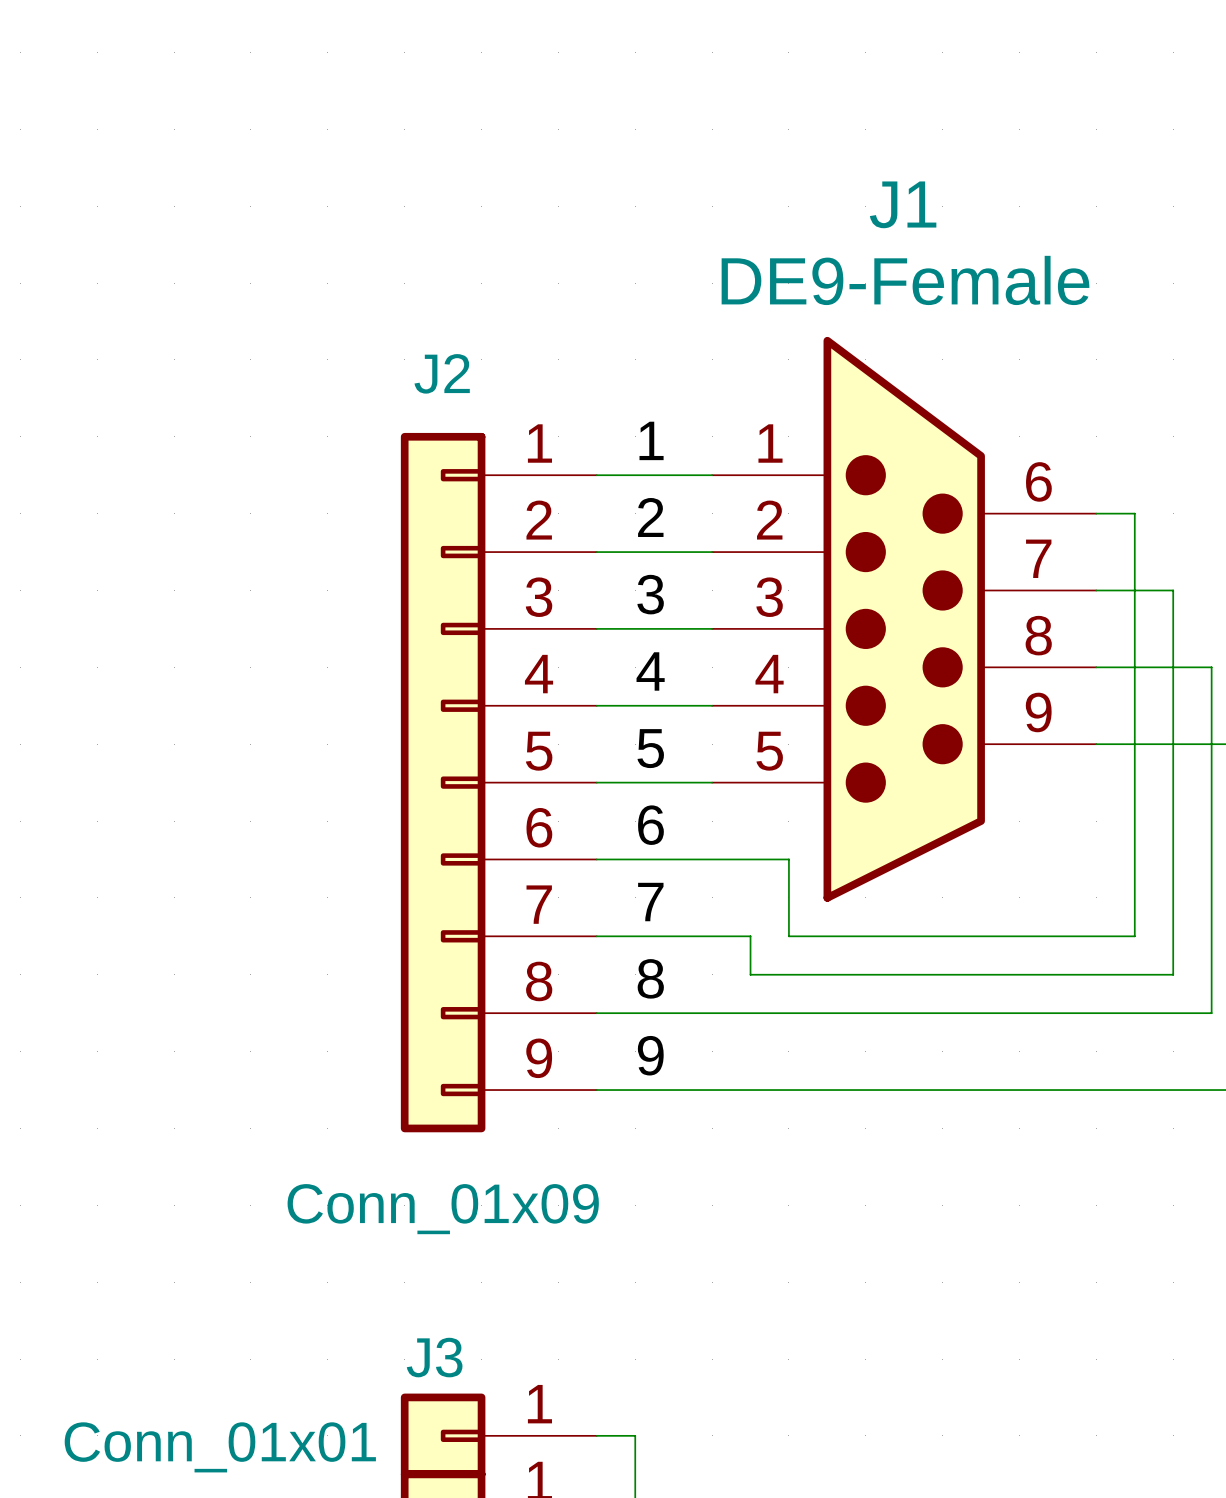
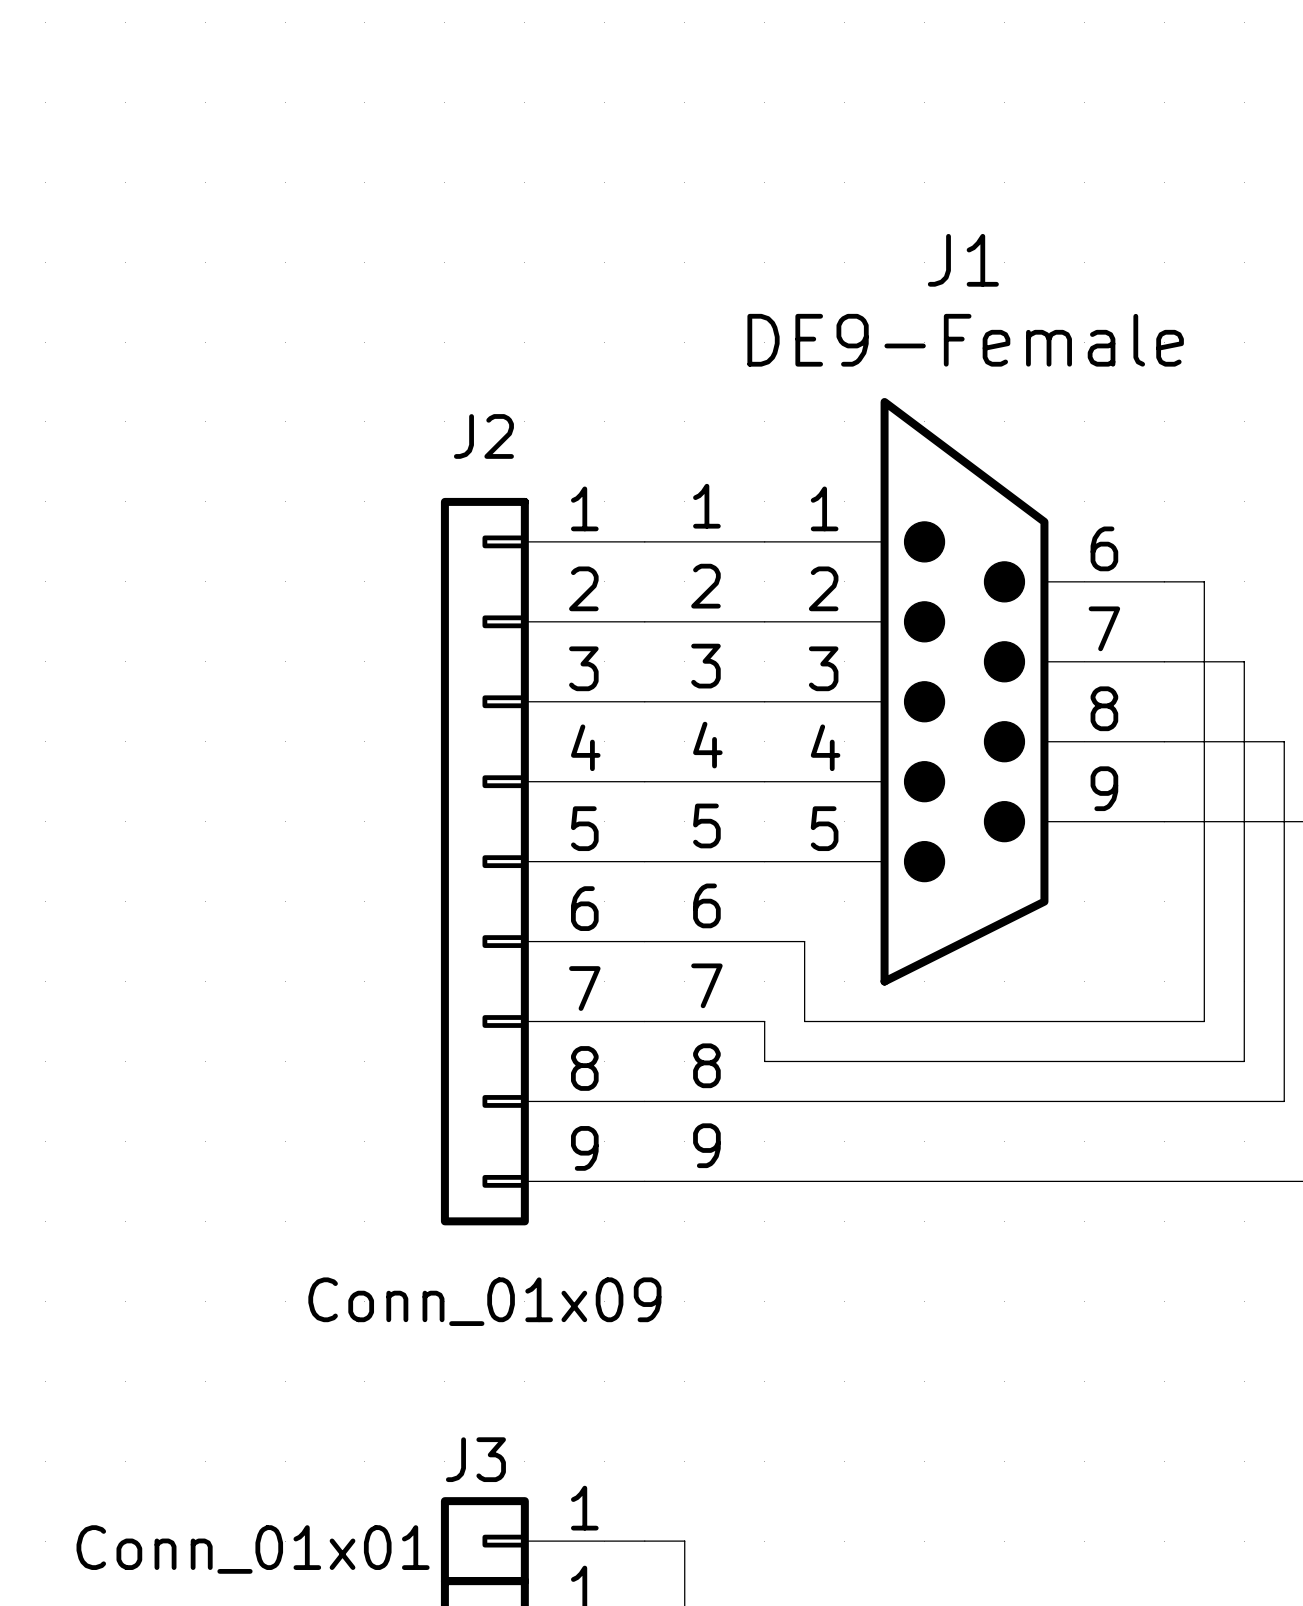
wire: (750, 859) (788, 859) (788, 936) -> (804, 941) (804, 1021) (844, 1021)
wire: (712, 936) (750, 936) (750, 974) -> (764, 1021) (764, 1061) (804, 1061)

